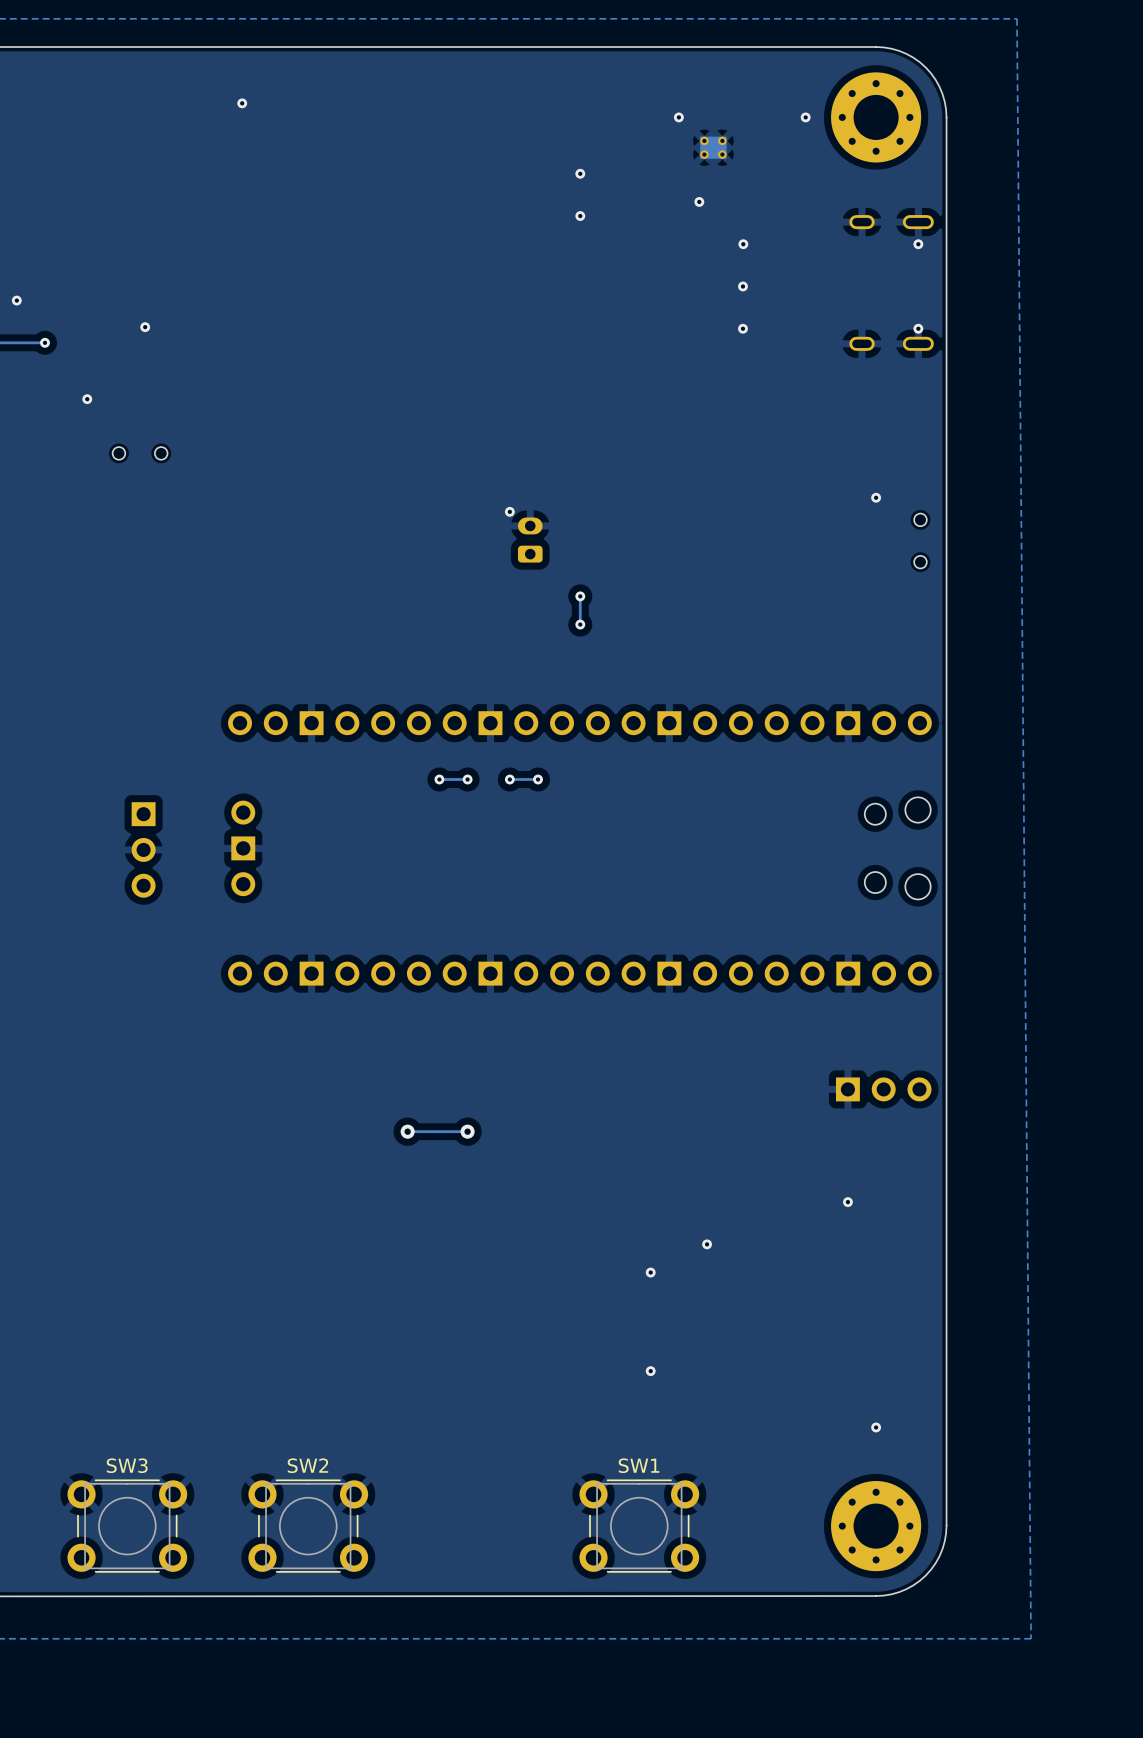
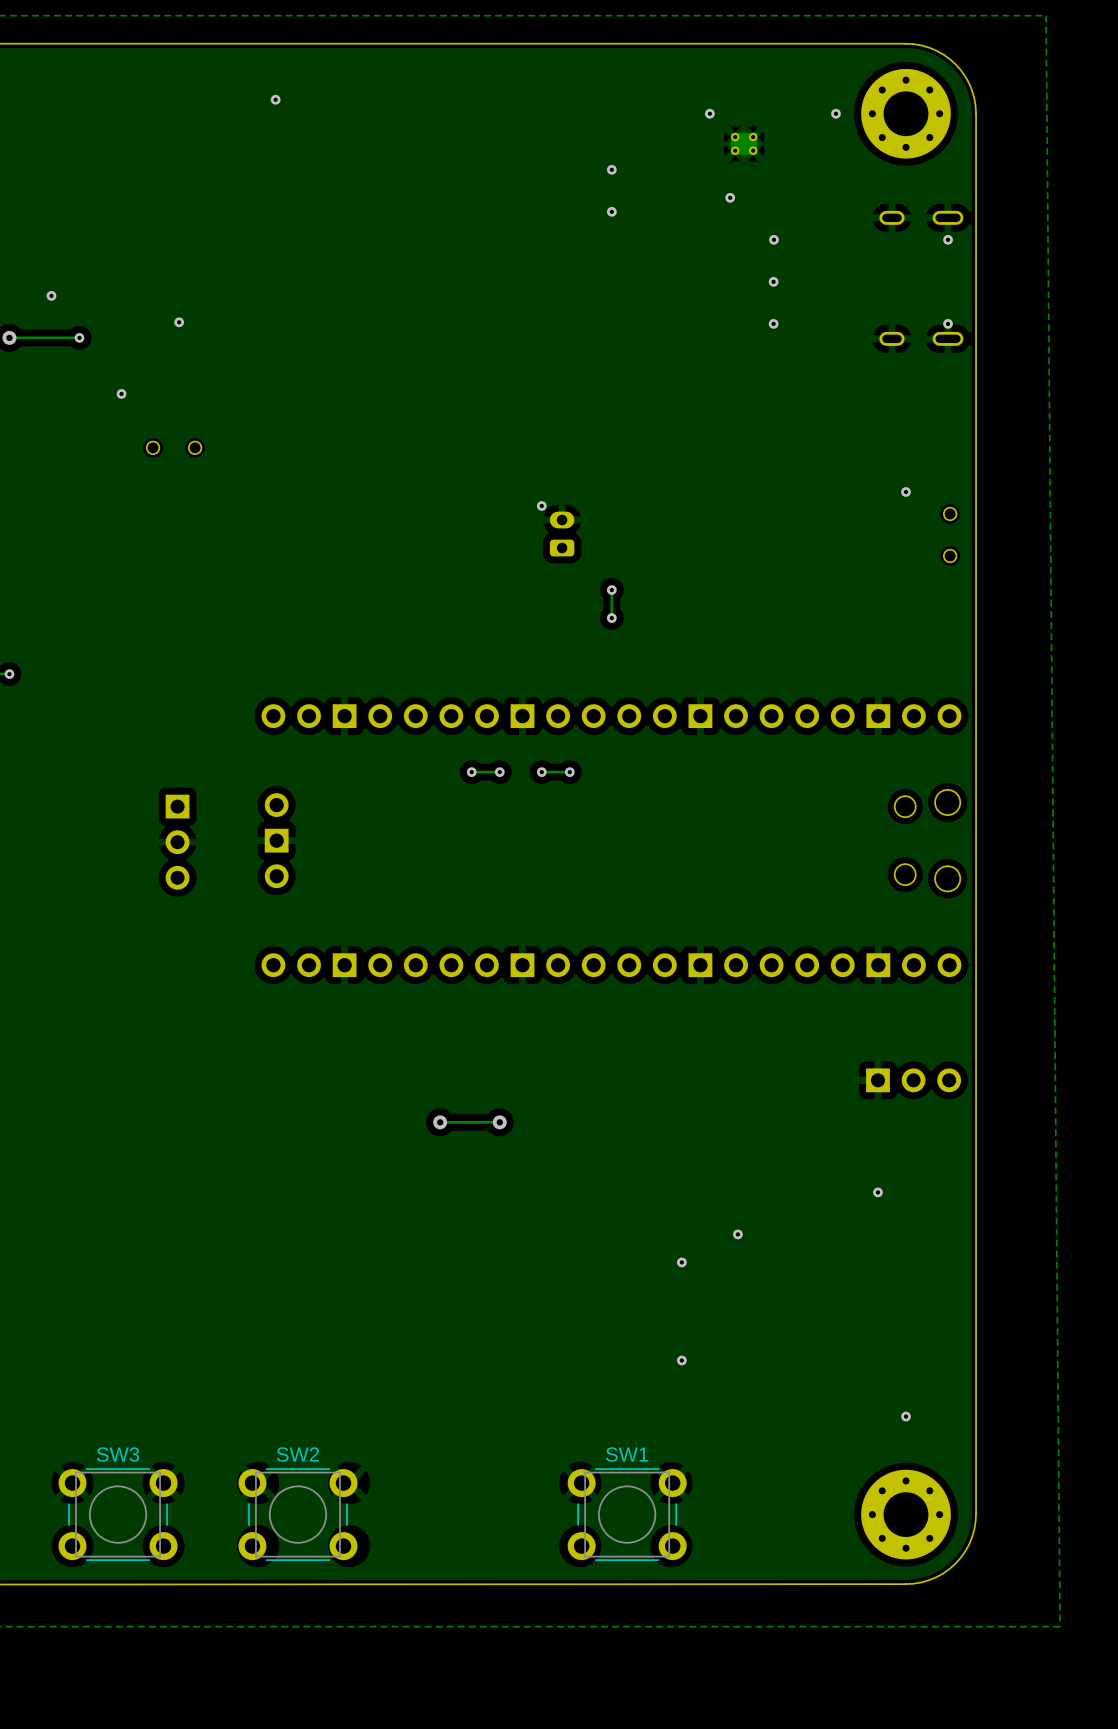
SW3 position: (127, 1526) -> (118, 1514)
SW2 position: (308, 1526) -> (297, 1514)
SW1 position: (639, 1526) -> (627, 1514)

